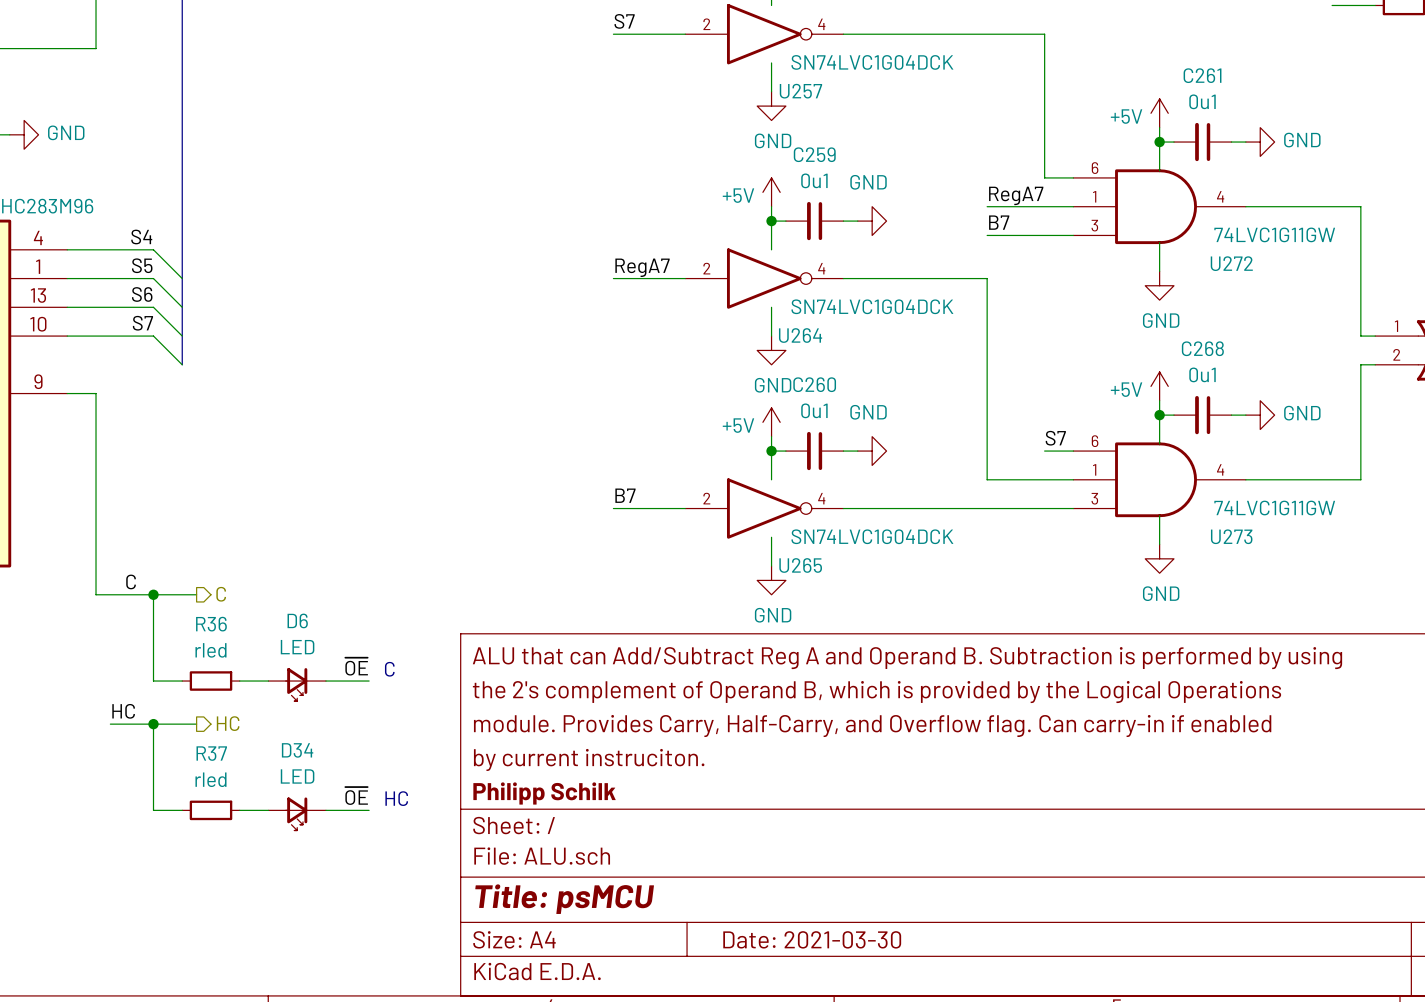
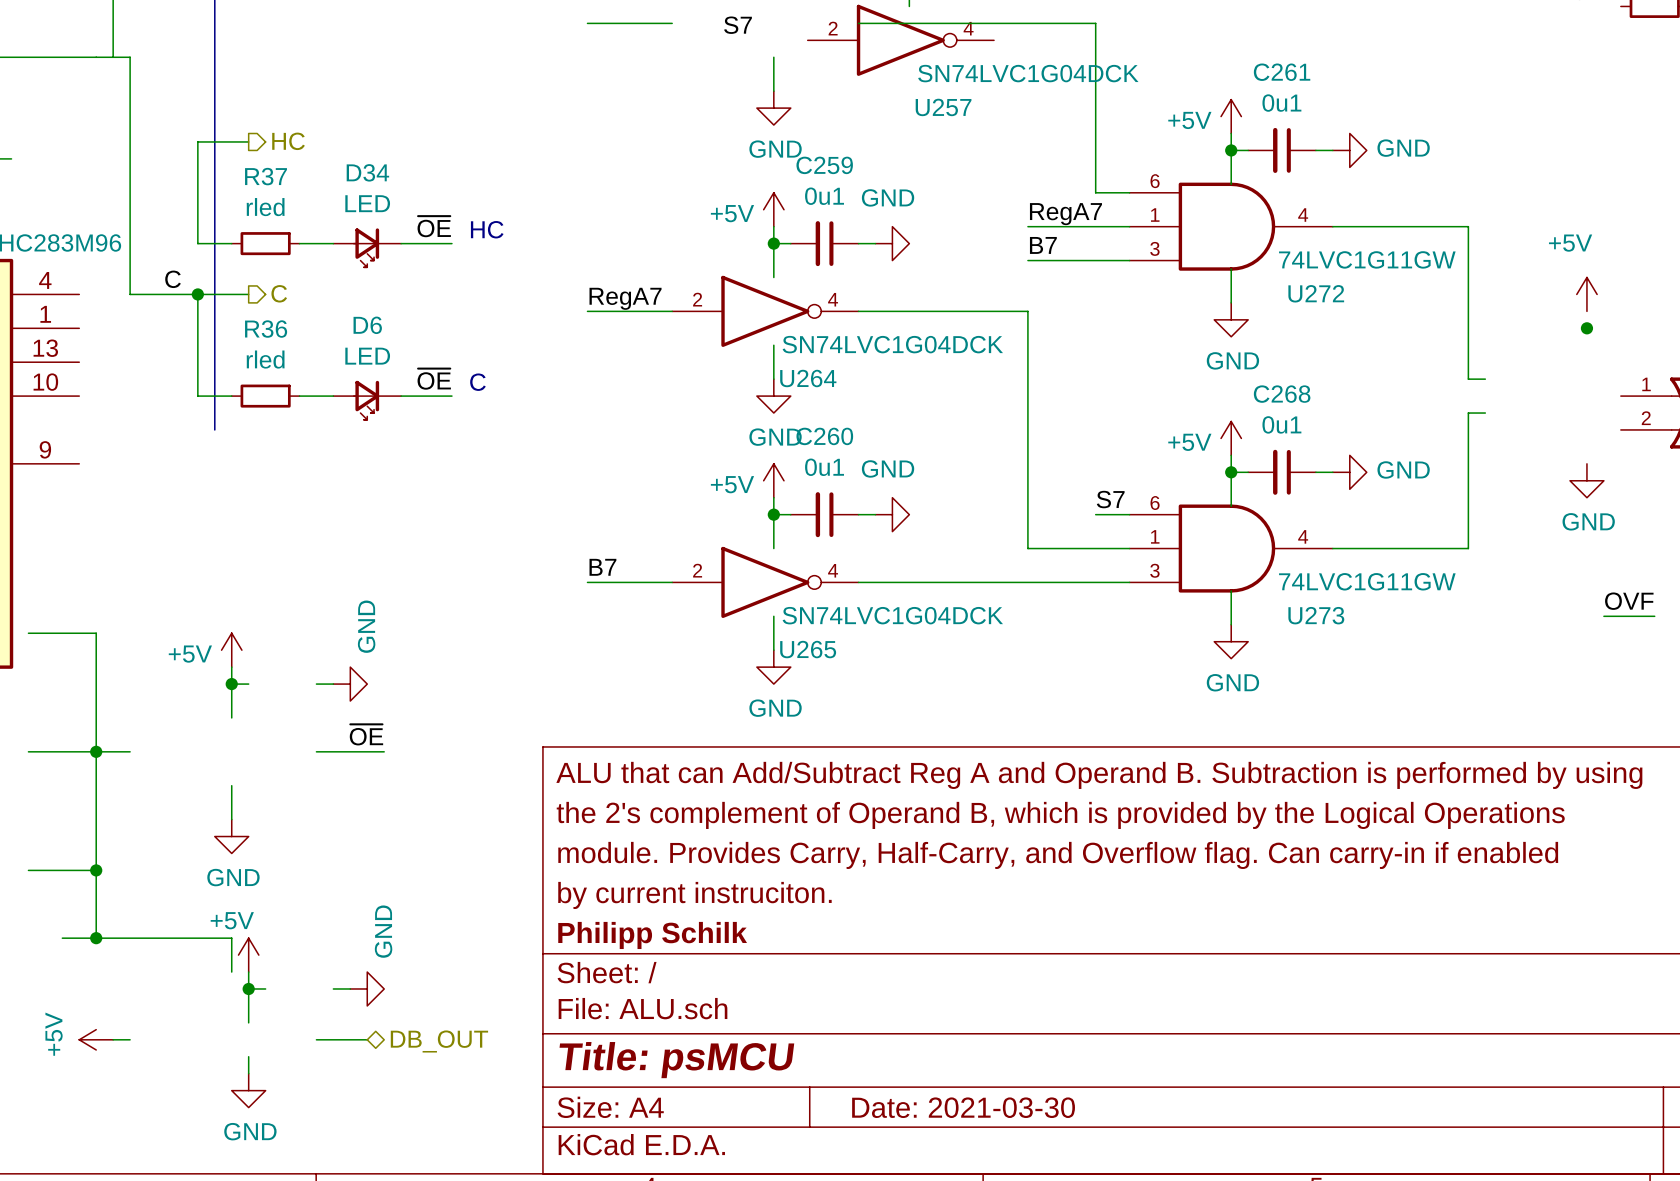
wire: (1332, 5) (1375, 5) -> none
wire: none -> (858, 23) (1095, 23) (1095, 192) (1129, 192)
wire: (613, 34) (685, 34) -> (587, 23) (672, 23)
wire: (843, 34) (1044, 34) (1044, 113) -> none
wire: (771, 62) (771, 91) -> (773, 57) (773, 91)
power symbol: none -> GND (773, 108)
power symbol: none -> +5V (1231, 116)
power symbol: GND (771, 106) -> none
power symbol: +5V (1159, 113) -> none
hierarchical label: none -> HC (288, 141)
wire: none -> (248, 141) (197, 141) (197, 243) (231, 243)
junction: none -> (1231, 150)
power symbol: none -> GND (1349, 150)
wire: (1159, 127) (1159, 170) -> none
power symbol: GND (24, 134) -> none
wire: (1159, 142) (1174, 142) -> (1231, 150) (1248, 150)
junction: (1159, 142) -> none
C261 position: (1202, 142) -> (1282, 150)
wire: (1231, 142) (1245, 142) -> (1315, 150) (1332, 150)
power symbol: GND (1260, 142) -> none
wire: (1044, 156) (1044, 177) (1073, 177) -> none
label: none -> ~{OE} (434, 226)
power symbol position: +5V (771, 192) -> +5V (773, 209)
text: none -> HC (487, 229)
label position: RegA7 (1016, 195) -> RegA7 (1065, 214)
wire: none -> (299, 243) (333, 243)
wire: none -> (401, 243) (451, 243)
junction: none -> (773, 243)
power symbol: none -> GND (892, 243)
wire: (771, 206) (771, 249) -> (773, 226) (773, 277)
wire: (987, 206) (1073, 206) -> (1027, 226) (1129, 226)
U272 position: (1159, 206) -> (1231, 226)
wire: (1245, 206) (1360, 206) (1360, 336) (1375, 336) -> (1332, 226) (1468, 226) (1468, 379) (1485, 379)
wire: (771, 221) (785, 221) -> (773, 243) (790, 243)
junction: (771, 221) -> none
C259 position: (814, 221) -> (824, 243)
wire: (843, 221) (857, 221) -> (858, 243) (875, 243)
power symbol: GND (872, 221) -> none
label position: B7 (999, 222) -> B7 (1043, 245)
wire: (987, 235) (1073, 235) -> (1027, 260) (1129, 260)
label: S4 (141, 236) -> none
label: none -> C (173, 279)
wire: (1159, 242) (1159, 271) -> (1231, 269) (1231, 302)
wire: (67, 249) (110, 249) -> (113, 57) (130, 57) (130, 294)
wire: (153, 249) (182, 278) -> (180, 294) (248, 294)
wire: none -> (197, 294) (197, 396) (231, 396)
junction: none -> (197, 294)
hierarchical label: none -> C (279, 293)
power symbol: none -> +5V (1586, 294)
label: S5 (142, 265) -> none
label position: RegA7 (642, 267) -> RegA7 (625, 298)
power symbol: none -> GND (1231, 319)
wire: (67, 278) (153, 278) (182, 307) -> none
wire: (613, 278) (685, 278) -> (587, 311) (672, 311)
U264 position: (764, 278) -> (765, 311)
wire: (843, 278) (987, 278) (987, 479) (1073, 479) -> (858, 311) (1027, 311) (1027, 548) (1129, 548)
junction: none -> (1586, 328)
power symbol: GND (1159, 285) -> none
label: S6 (142, 294) -> none
wire: (67, 307) (153, 307) (182, 336) -> none
wire: (771, 307) (771, 336) -> (773, 345) (773, 379)
label: none -> ~{OE} (434, 379)
label: S7 (142, 323) -> none
text: none -> C (477, 382)
wire: (67, 336) (153, 336) (182, 364) -> none
wire: none -> (299, 396) (333, 396)
wire: none -> (401, 396) (451, 396)
power symbol: none -> GND (773, 396)
power symbol: GND (771, 350) -> none
wire: (1375, 364) (1360, 364) (1360, 479) (1245, 479) -> (1485, 413) (1468, 413) (1468, 548) (1332, 548)
power symbol: none -> +5V (1231, 438)
power symbol: +5V (1159, 386) -> none
wire: (67, 393) (96, 393) (96, 594) (196, 594) -> none
junction: none -> (1231, 472)
power symbol: none -> GND (1349, 472)
wire: (1159, 400) (1159, 443) -> (1231, 455) (1231, 506)
power symbol: none -> GND (1586, 480)
wire: (1159, 415) (1174, 415) -> (1231, 472) (1248, 472)
junction: (1159, 415) -> none
C268 position: (1202, 415) -> (1282, 472)
wire: (1231, 415) (1245, 415) -> (1315, 472) (1332, 472)
power symbol: GND (1260, 415) -> none
power symbol position: +5V (771, 422) -> +5V (773, 480)
junction: none -> (773, 514)
power symbol: none -> GND (892, 514)
wire: (771, 436) (771, 479) -> (773, 497) (773, 548)
label position: S7 (1055, 438) -> S7 (1110, 499)
wire: (771, 451) (785, 451) -> (773, 514) (790, 514)
junction: (771, 451) -> none
C260 position: (814, 451) -> (824, 514)
wire: (843, 451) (857, 451) -> (858, 514) (875, 514)
power symbol: GND (872, 451) -> none
wire: (1044, 451) (1073, 451) -> (1095, 514) (1129, 514)
U273 position: (1159, 479) -> (1231, 548)
label position: B7 (625, 495) -> B7 (602, 567)
wire: (613, 508) (685, 508) -> (587, 582) (672, 582)
U265 position: (764, 508) -> (765, 582)
wire: (843, 508) (1073, 508) -> (858, 582) (1129, 582)
label: none -> OVF (1629, 601)
wire: (1159, 515) (1159, 544) -> (1231, 590) (1231, 624)
wire: none -> (1603, 616) (1654, 616)
wire: none -> (28, 633) (96, 633) (96, 938)
wire: (771, 537) (771, 566) -> (773, 616) (773, 650)
power symbol: none -> GND (1231, 641)
power symbol: none -> +5V (231, 650)
power symbol: GND (1159, 558) -> none
wire: none -> (231, 667) (231, 717)
power symbol: none -> GND (773, 667)
wire: none -> (231, 684) (248, 684)
junction: none -> (231, 684)
wire: none -> (316, 684) (333, 684)
power symbol: none -> GND (350, 684)
power symbol: GND (771, 580) -> none
label: C (131, 581) -> none
wire: (153, 594) (153, 681) (182, 681) -> none
junction: (153, 594) -> none
hierarchical label: C (221, 594) -> none
junction: none -> (96, 751)
wire: none -> (316, 751) (384, 751)
wire: none -> (231, 785) (231, 819)
label position: ~{OE} (356, 666) -> ~{OE} (366, 734)
text: C (389, 669) -> none
R36 position: (210, 681) -> (265, 396)
wire: (239, 681) (268, 681) -> none
wire: (325, 681) (369, 681) -> none
D6 position: (297, 684) -> (367, 400)
power symbol: none -> GND (231, 836)
label: HC (123, 711) -> none
hierarchical label: HC (228, 723) -> none
wire: (110, 724) (196, 724) -> (28, 751) (130, 751)
wire: (153, 724) (153, 810) (182, 810) -> none
junction: (153, 724) -> none
wire: none -> (28, 870) (96, 870)
junction: none -> (96, 870)
label: ~{OE} (356, 795) -> none
wire: none -> (62, 938) (231, 938) (231, 972)
junction: none -> (96, 938)
text: HC (396, 798) -> none
R37 position: (210, 810) -> (265, 243)
power symbol: none -> +5V (248, 955)
wire: (239, 810) (268, 810) -> none
wire: (325, 810) (369, 810) -> (316, 1039) (367, 1039)
D34 position: (297, 813) -> (367, 247)
wire: none -> (248, 972) (248, 1022)
wire: none -> (248, 988) (265, 988)
junction: none -> (248, 988)
wire: none -> (333, 988) (350, 988)
power symbol: none -> GND (367, 988)
hierarchical label: none -> DB_OUT (439, 1041)
power symbol: none -> +5V (96, 1039)
wire: none -> (113, 1039) (130, 1039)
wire: none -> (248, 1056) (248, 1073)
power symbol: none -> GND (248, 1090)

